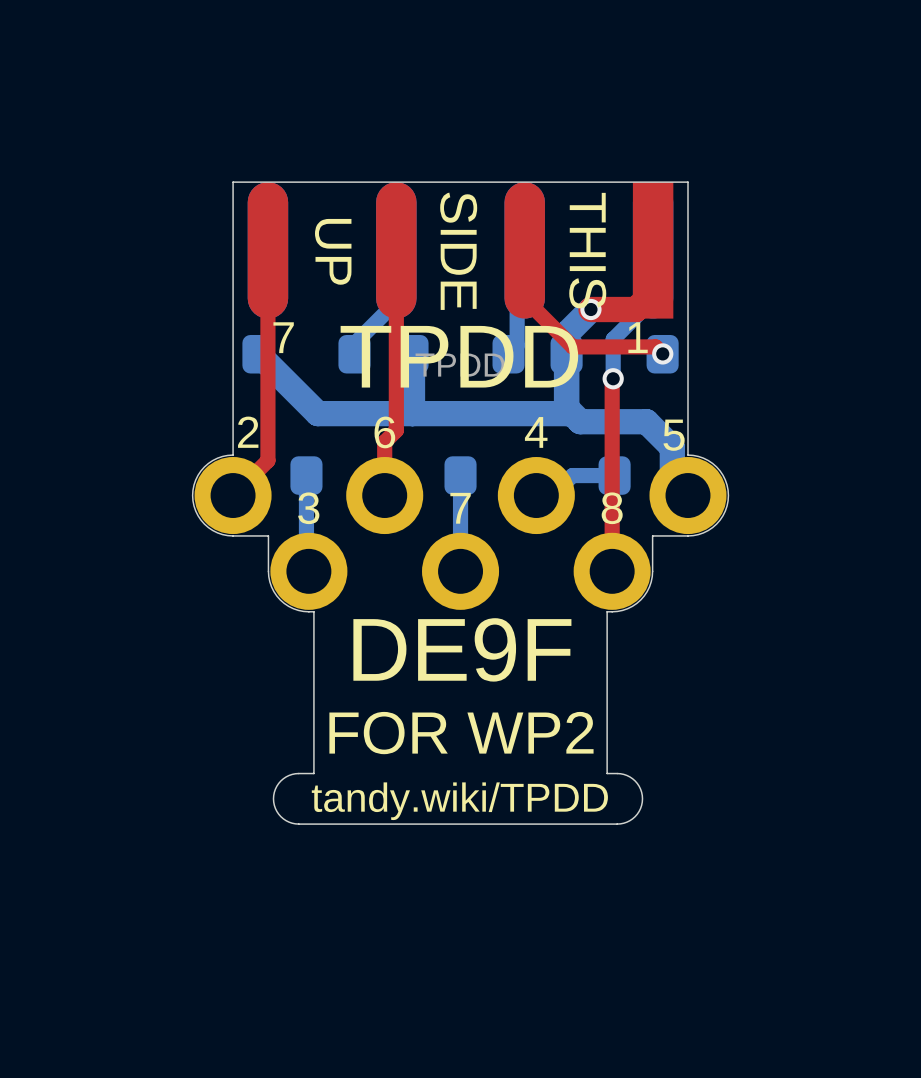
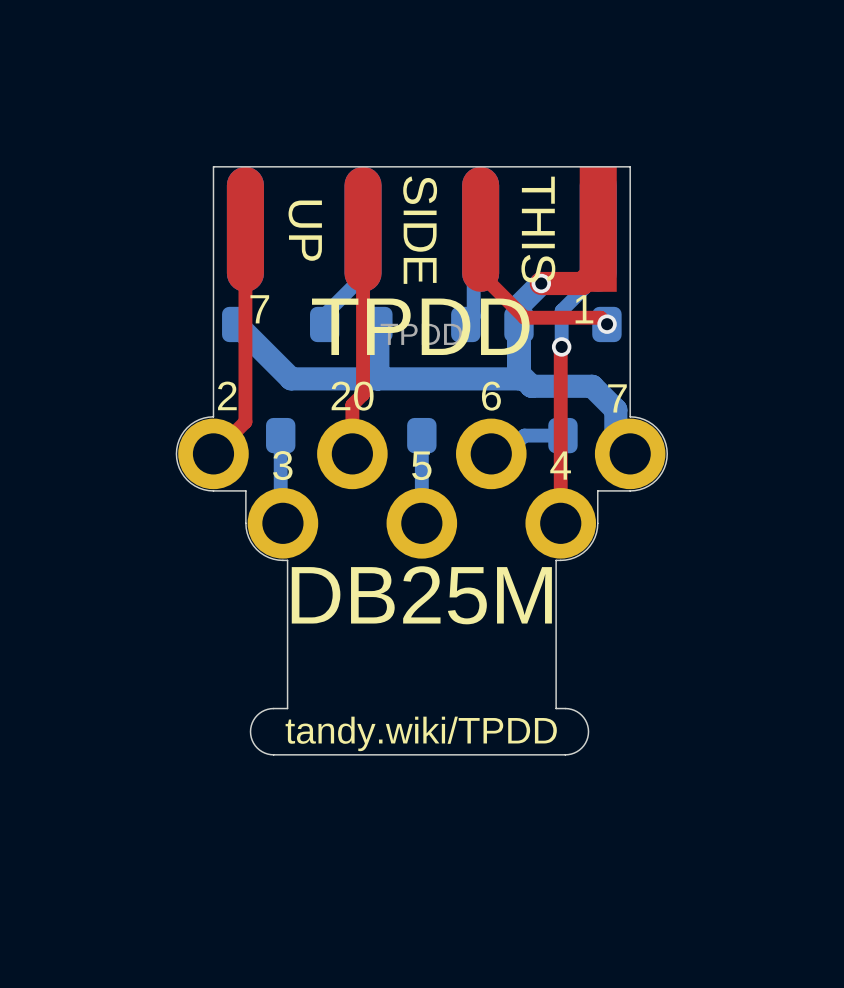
text: 6 (384, 432) -> 20 (352, 396)
text: 4 (536, 432) -> 6 (491, 396)
text: 5 (674, 435) -> 7 (617, 398)
text: 7 (460, 508) -> 5 (421, 465)
text: 8 (612, 508) -> 4 (560, 465)
text: DE9F (462, 649) -> DB25M (421, 595)
text: FOR WP2 (461, 733) -> none

